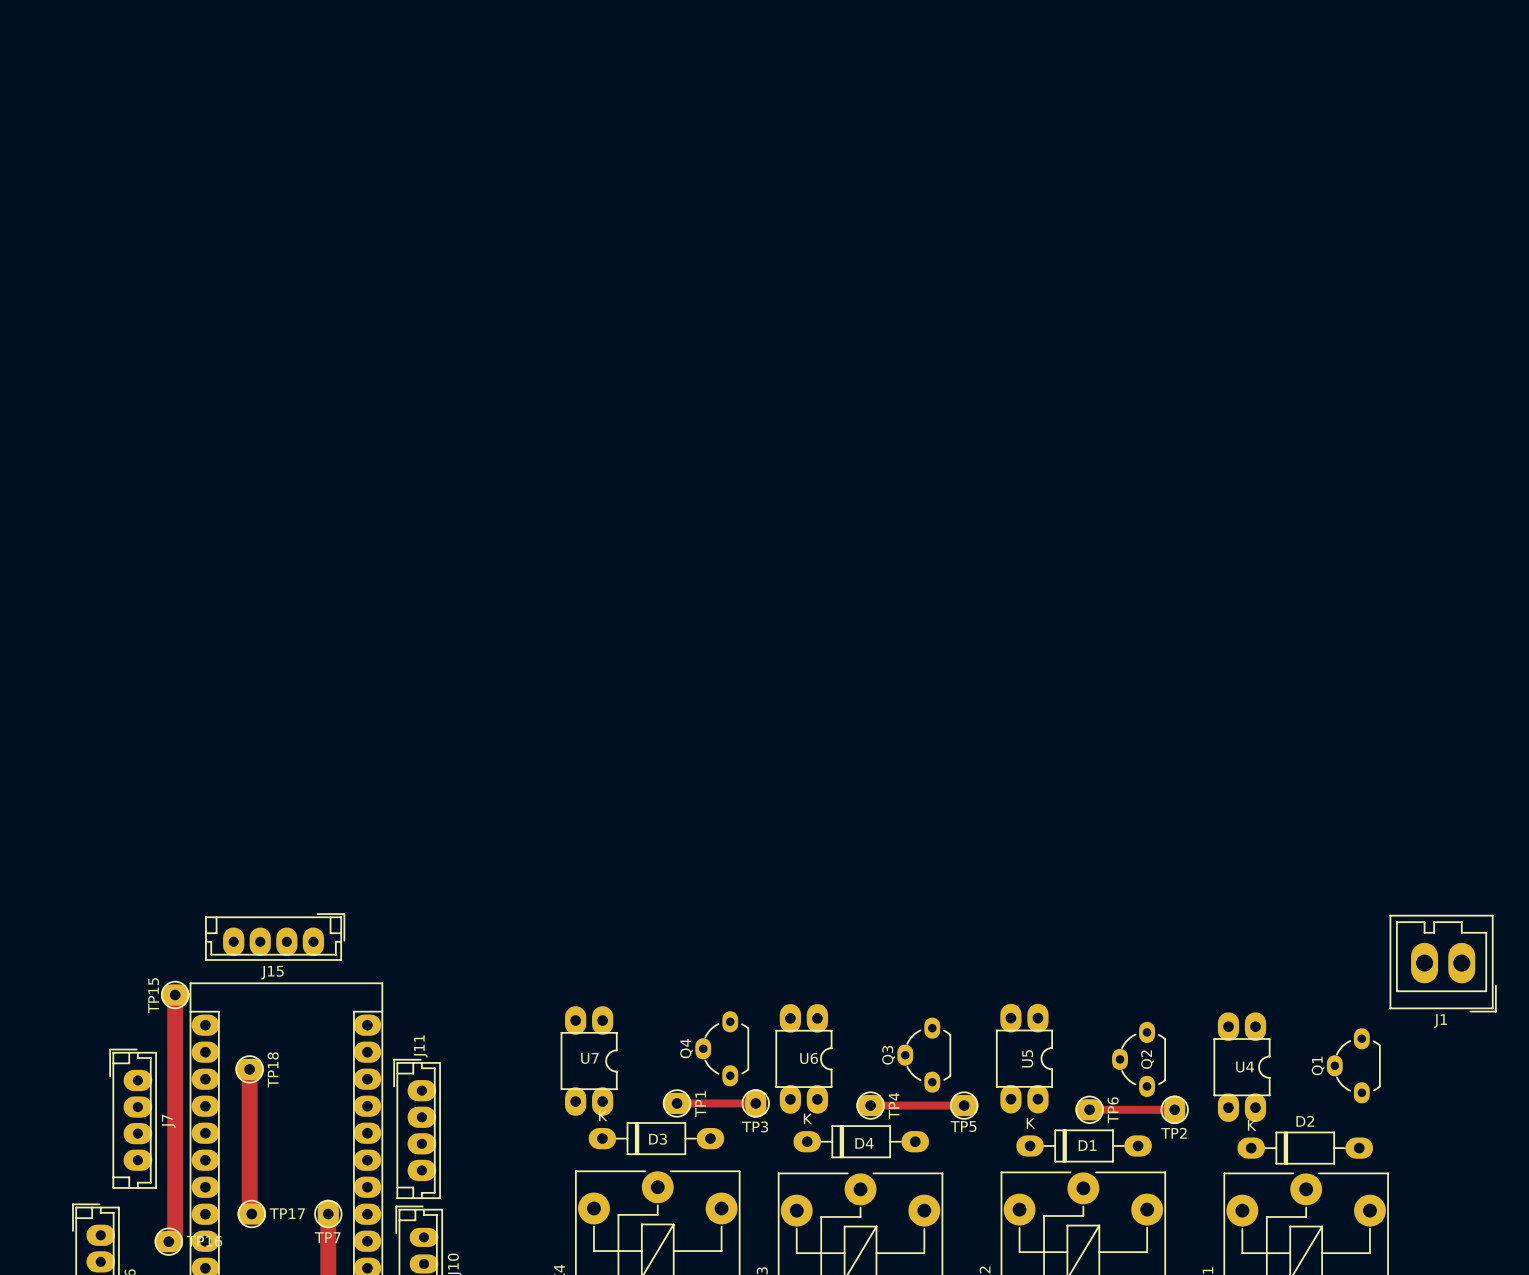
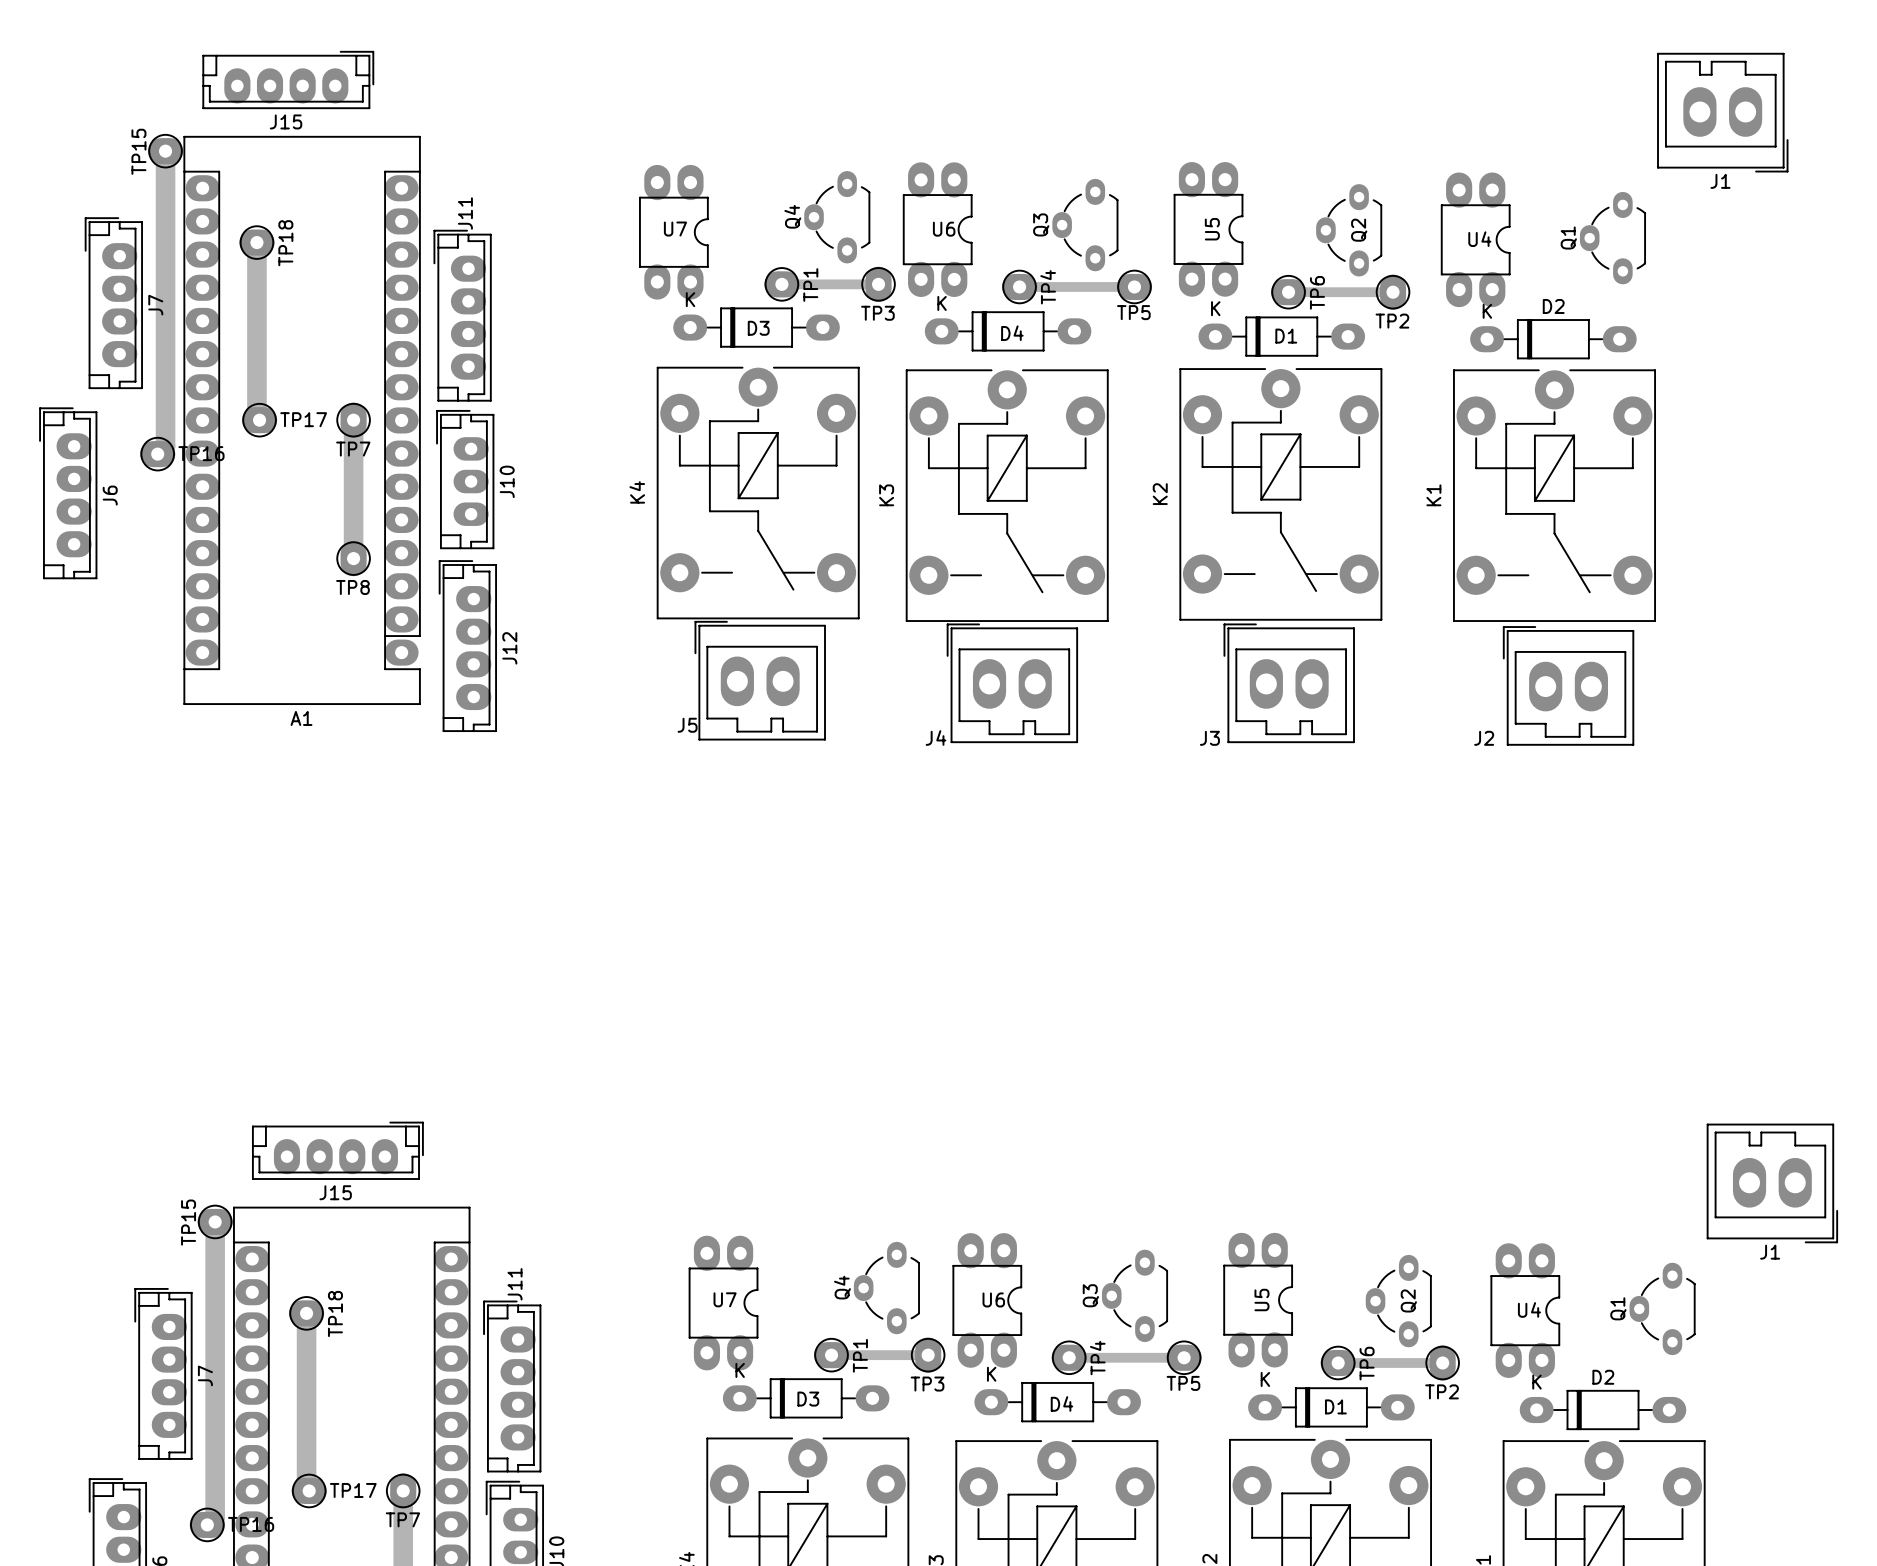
J15: none -> (288, 80)
J1: none -> (1722, 112)
track: none -> (165, 151) (165, 446) (157, 454)
TP15: none -> (165, 151)
Q4: none -> (837, 217)
Q3: none -> (1085, 225)
U6: none -> (937, 229)
U5: none -> (1208, 229)
Q2: none -> (1349, 230)
U7: none -> (673, 232)
Q1: none -> (1612, 238)
U4: none -> (1475, 239)
track: none -> (256, 242) (256, 417) (259, 420)
TP18: none -> (256, 242)
track: none -> (781, 284) (878, 284)
TP1: none -> (781, 284)
TP3: none -> (878, 284)
track: none -> (1019, 286) (1134, 286)
TP4: none -> (1019, 286)
TP5: none -> (1134, 286)
track: none -> (1288, 292) (1393, 292)
TP6: none -> (1288, 292)
TP2: none -> (1393, 292)
J7: none -> (113, 303)
J11: none -> (462, 315)
D3: none -> (756, 327)
D4: none -> (1008, 331)
D1: none -> (1281, 336)
D2: none -> (1553, 339)
TP17: none -> (259, 420)
A1: none -> (302, 420)
track: none -> (353, 420) (353, 558)
TP7: none -> (353, 420)
TP16: none -> (157, 454)
J10: none -> (465, 479)
J6: none -> (68, 493)
K4: none -> (758, 493)
K2: none -> (1280, 494)
K3: none -> (1007, 495)
K1: none -> (1554, 495)
TP8: none -> (353, 558)
J12: none -> (467, 646)
J5: none -> (760, 680)
J4: none -> (1012, 683)
J3: none -> (1289, 683)
J2: none -> (1568, 685)

